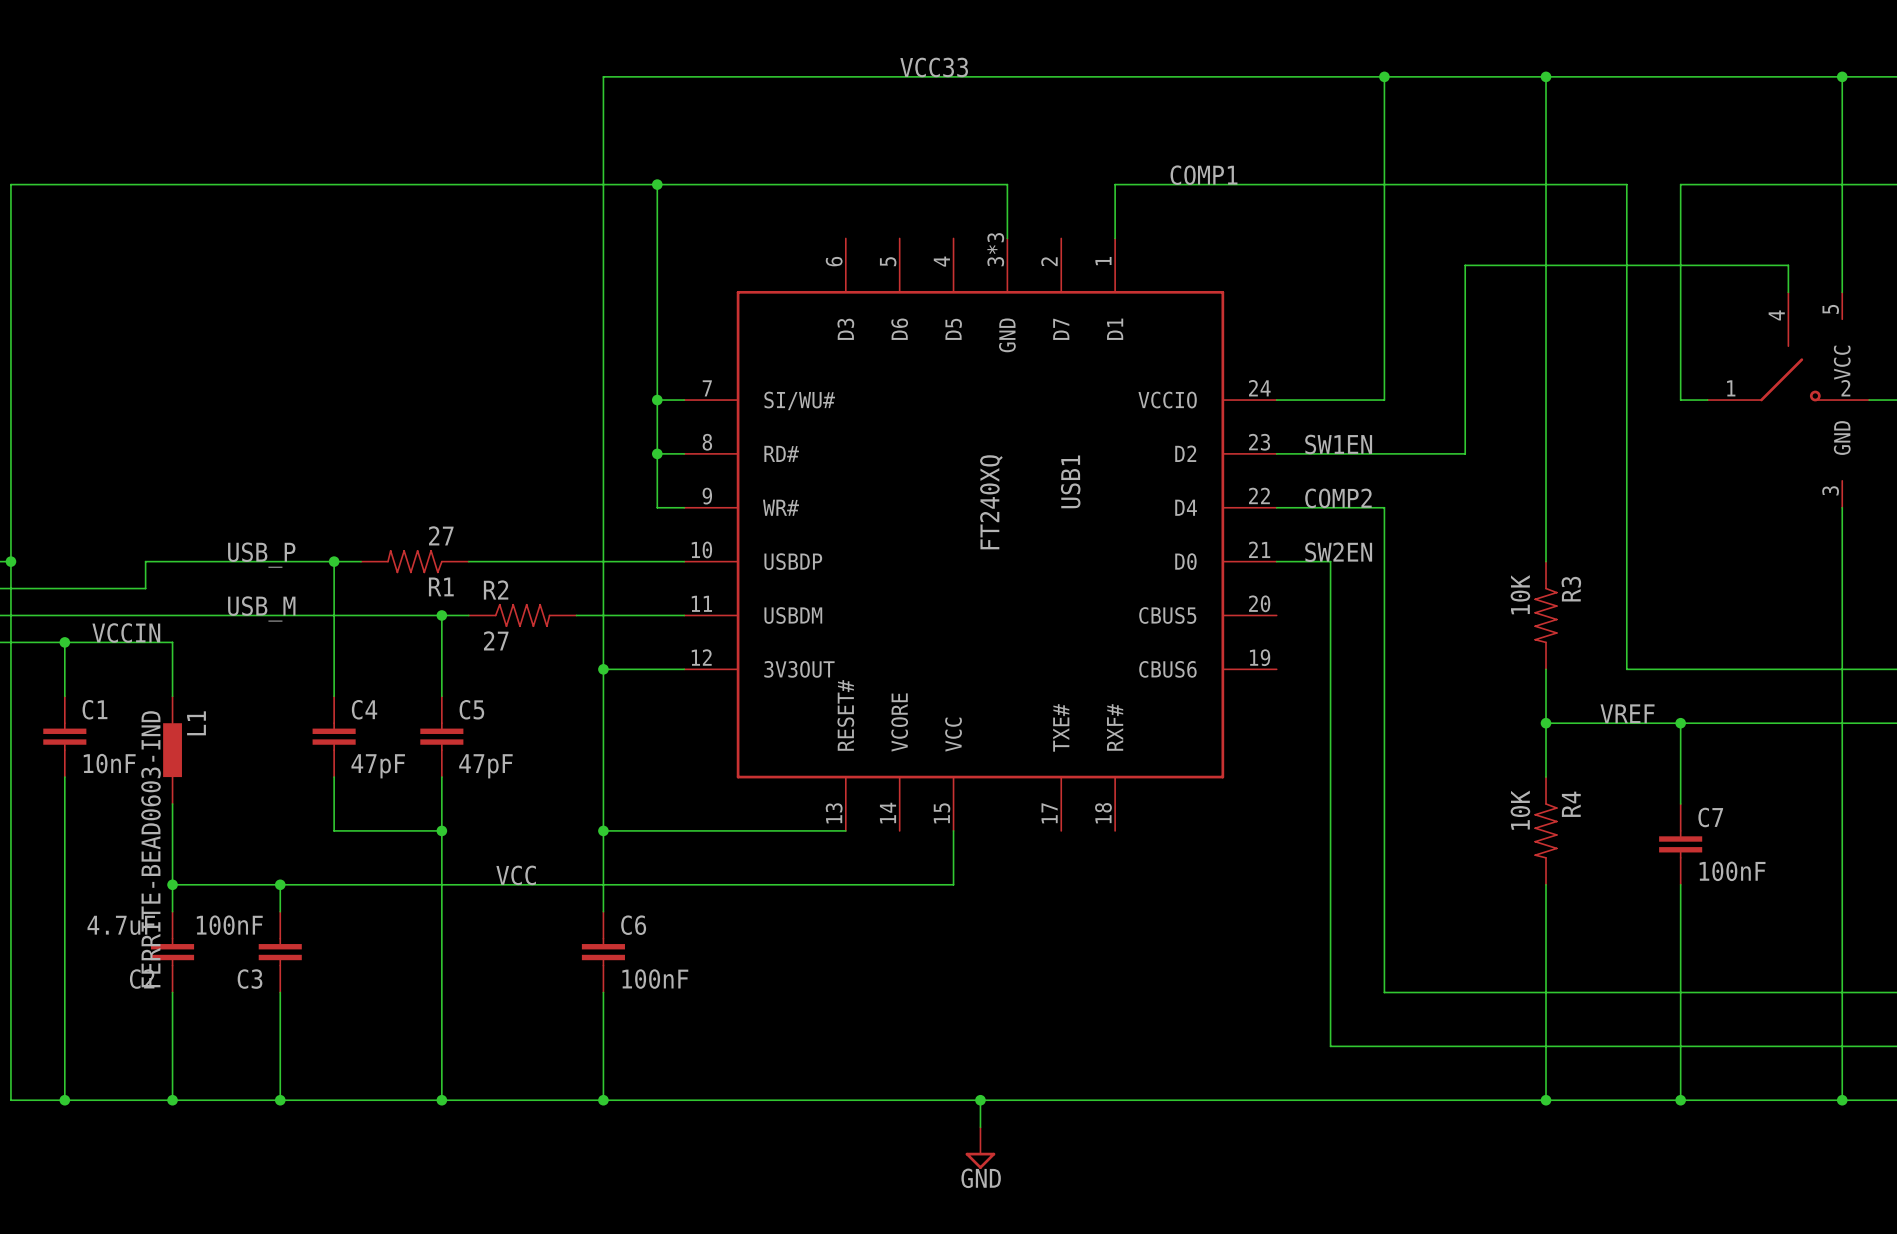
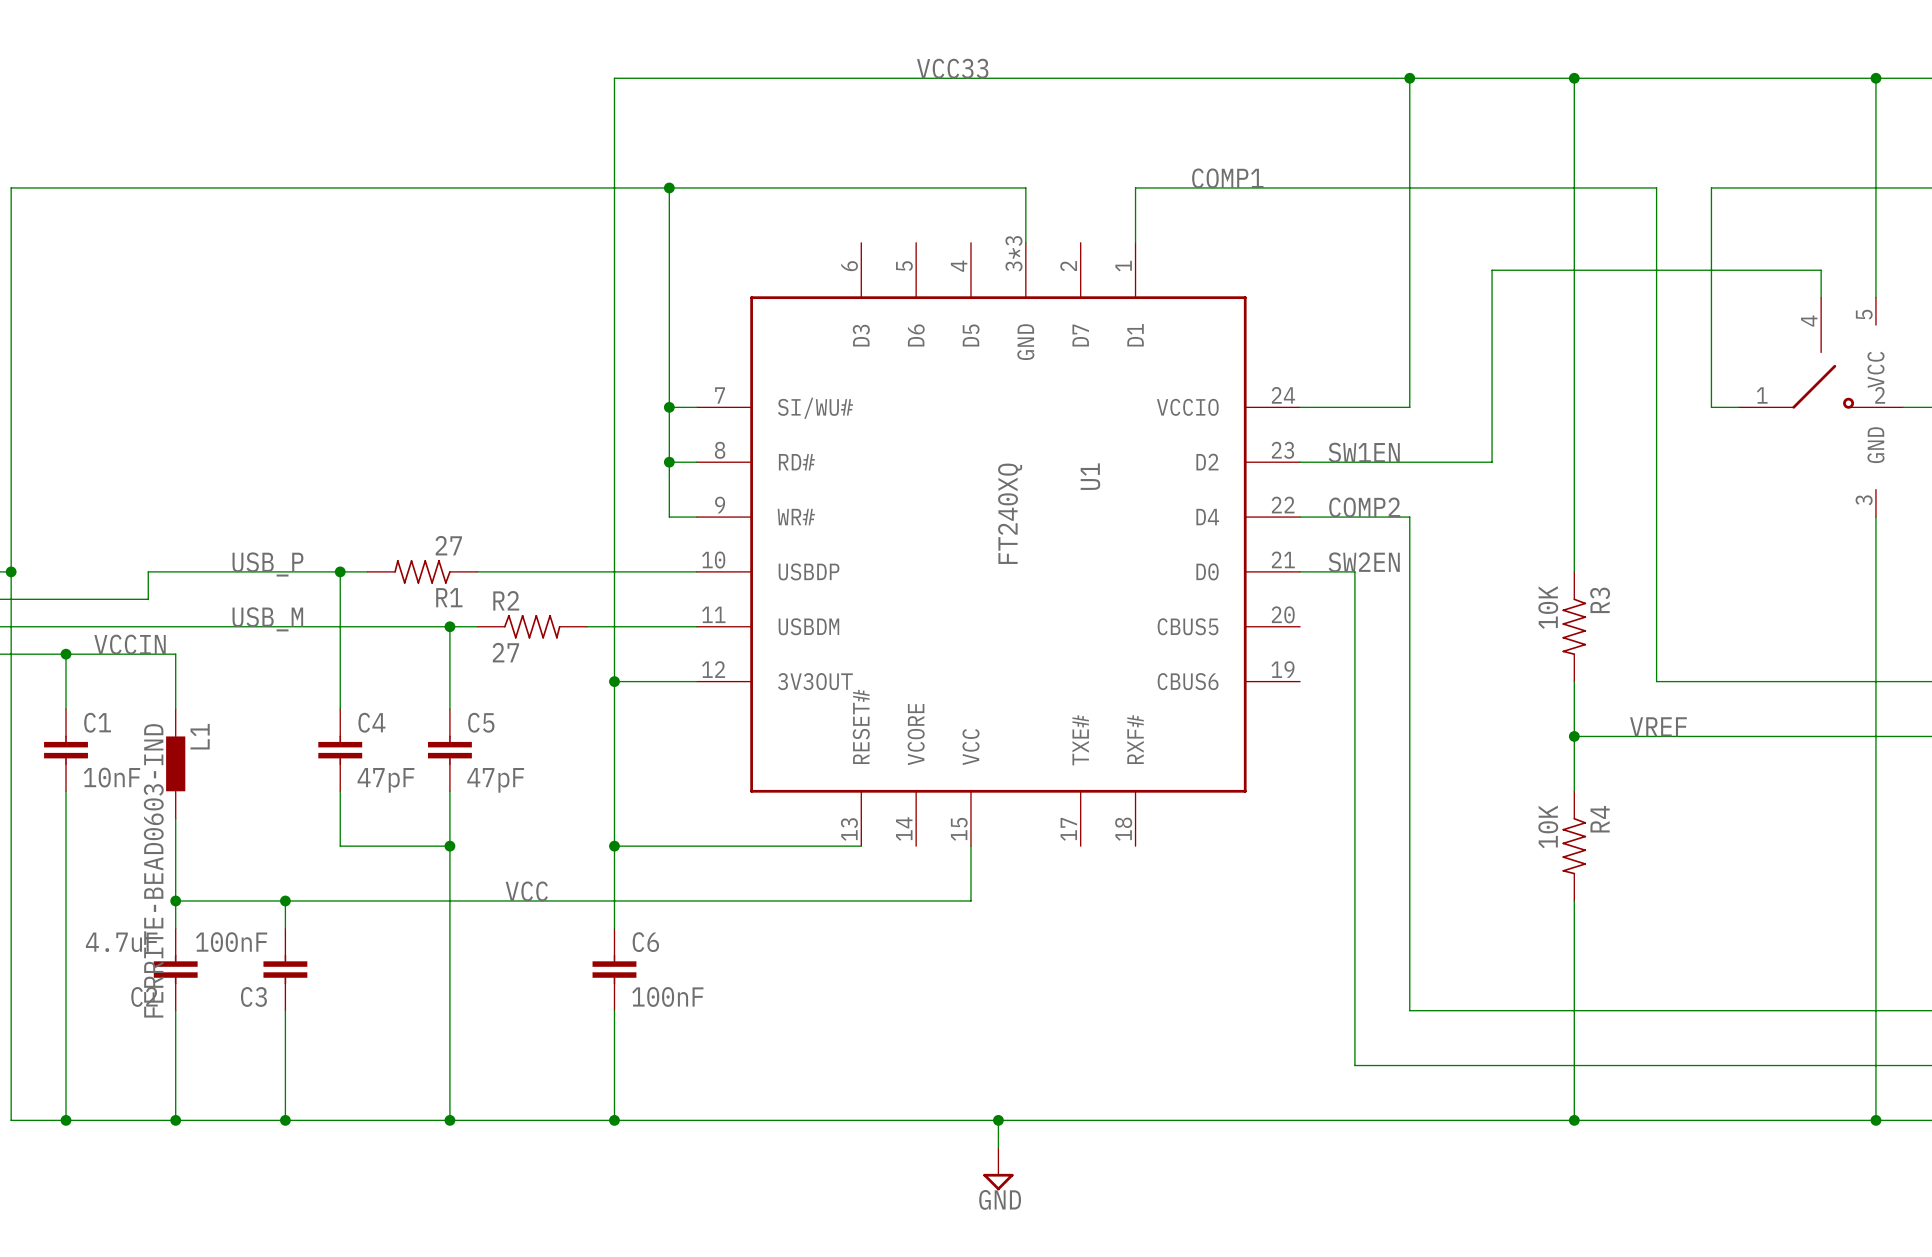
USB1 name: USB1 (1070, 481) -> U1 (1090, 476)
wire: (1680, 723) (1680, 803) -> none
junction: (1680, 723) -> none
C7: 100nF (1680, 844) -> none
wire: (1680, 884) (1680, 1100) -> none
junction: (1680, 1100) -> none

